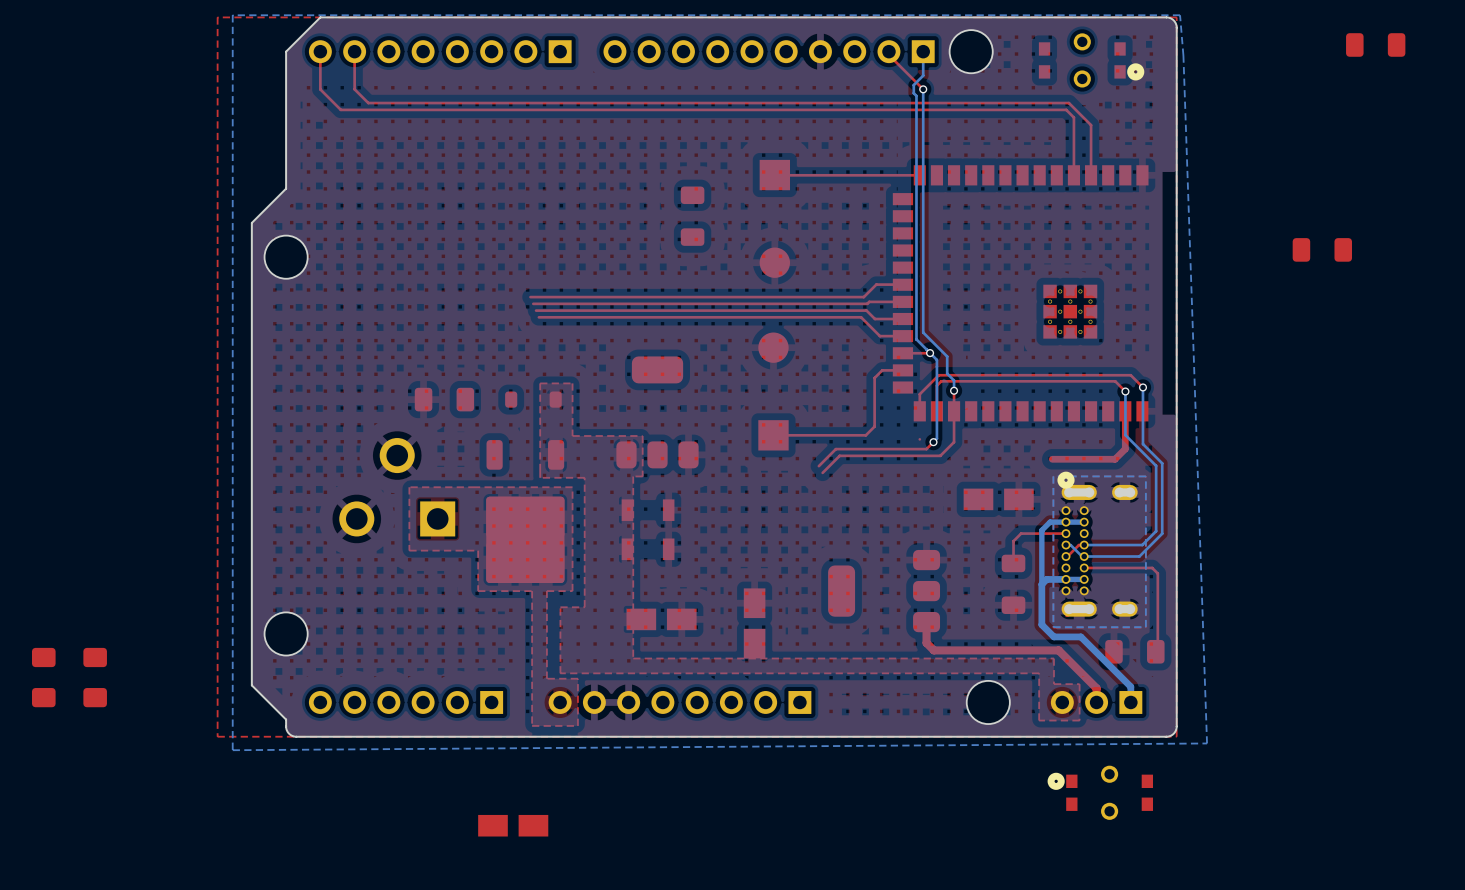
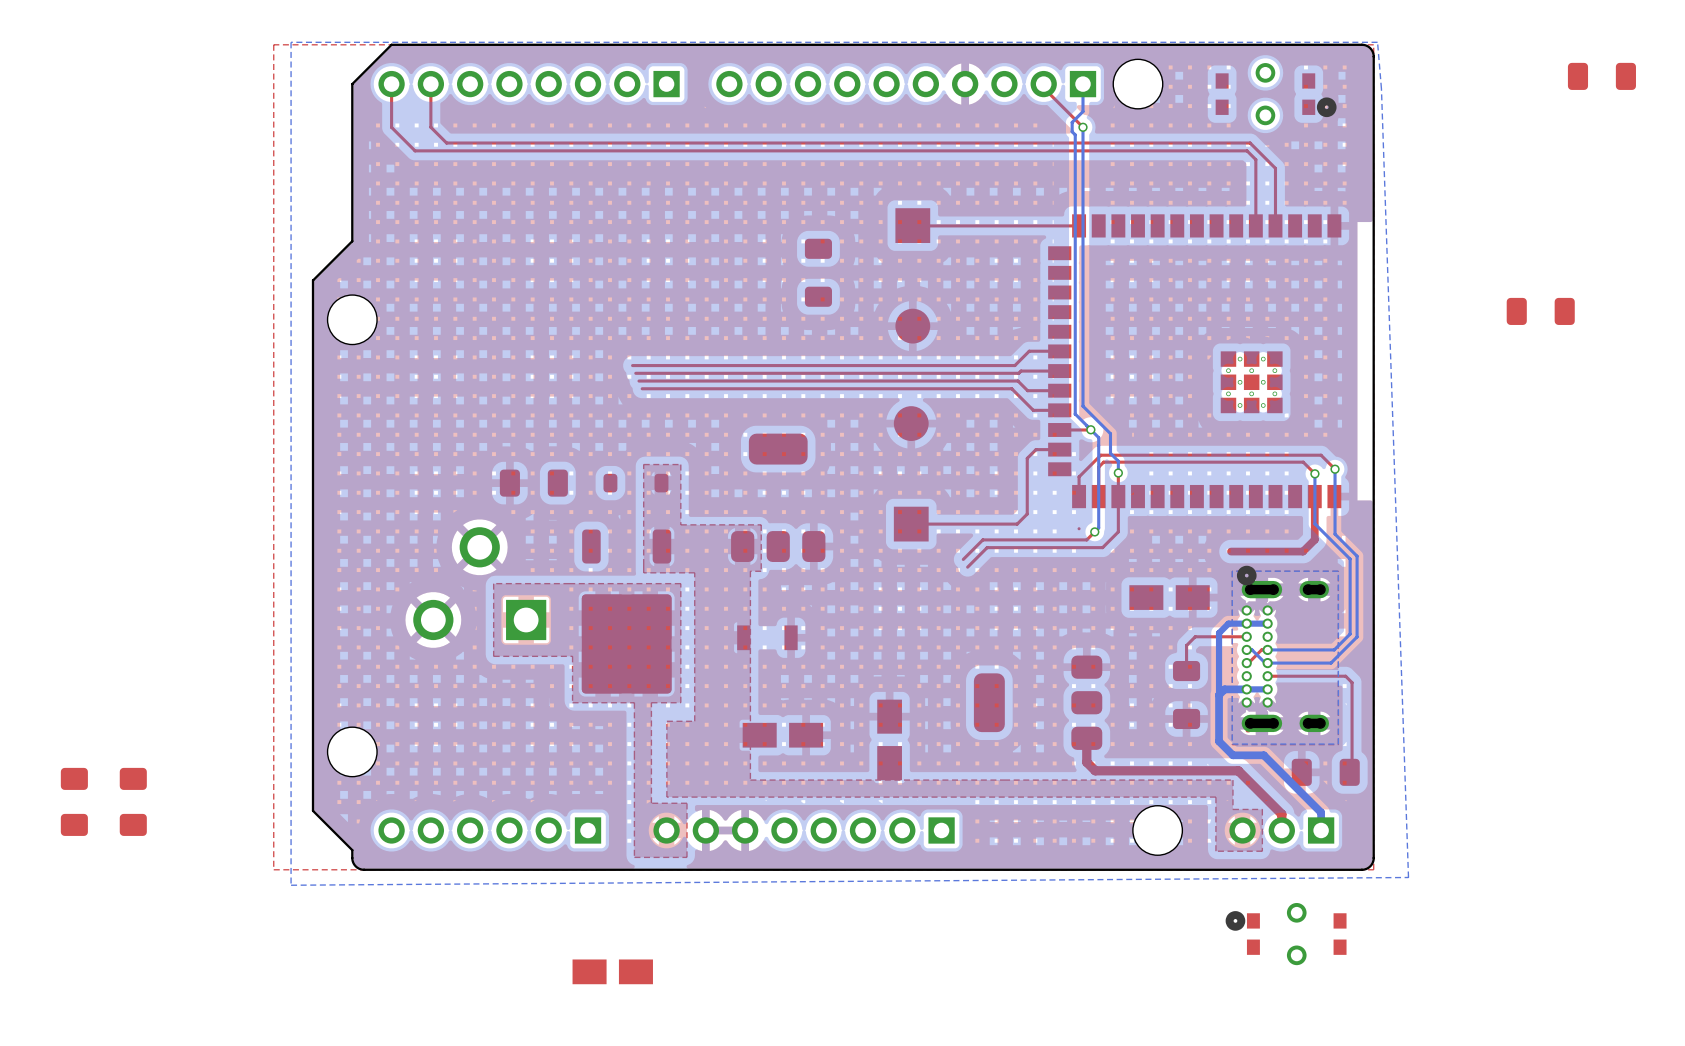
part: (648, 510) -> none
part: none -> (767, 637)
part: (648, 549) -> none

